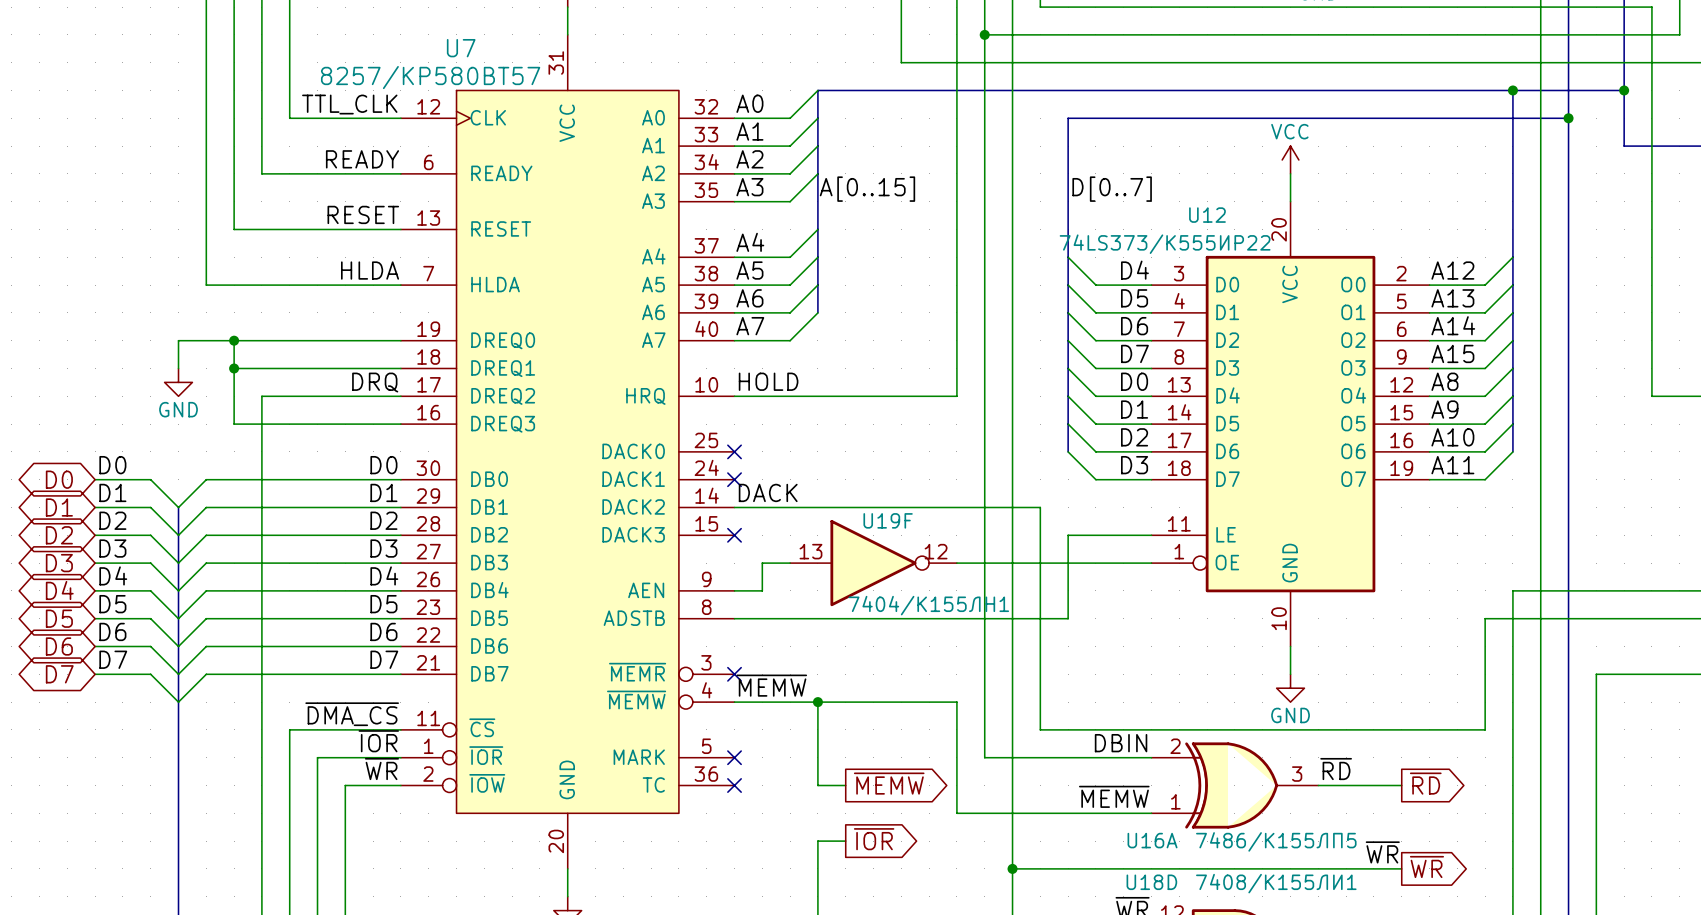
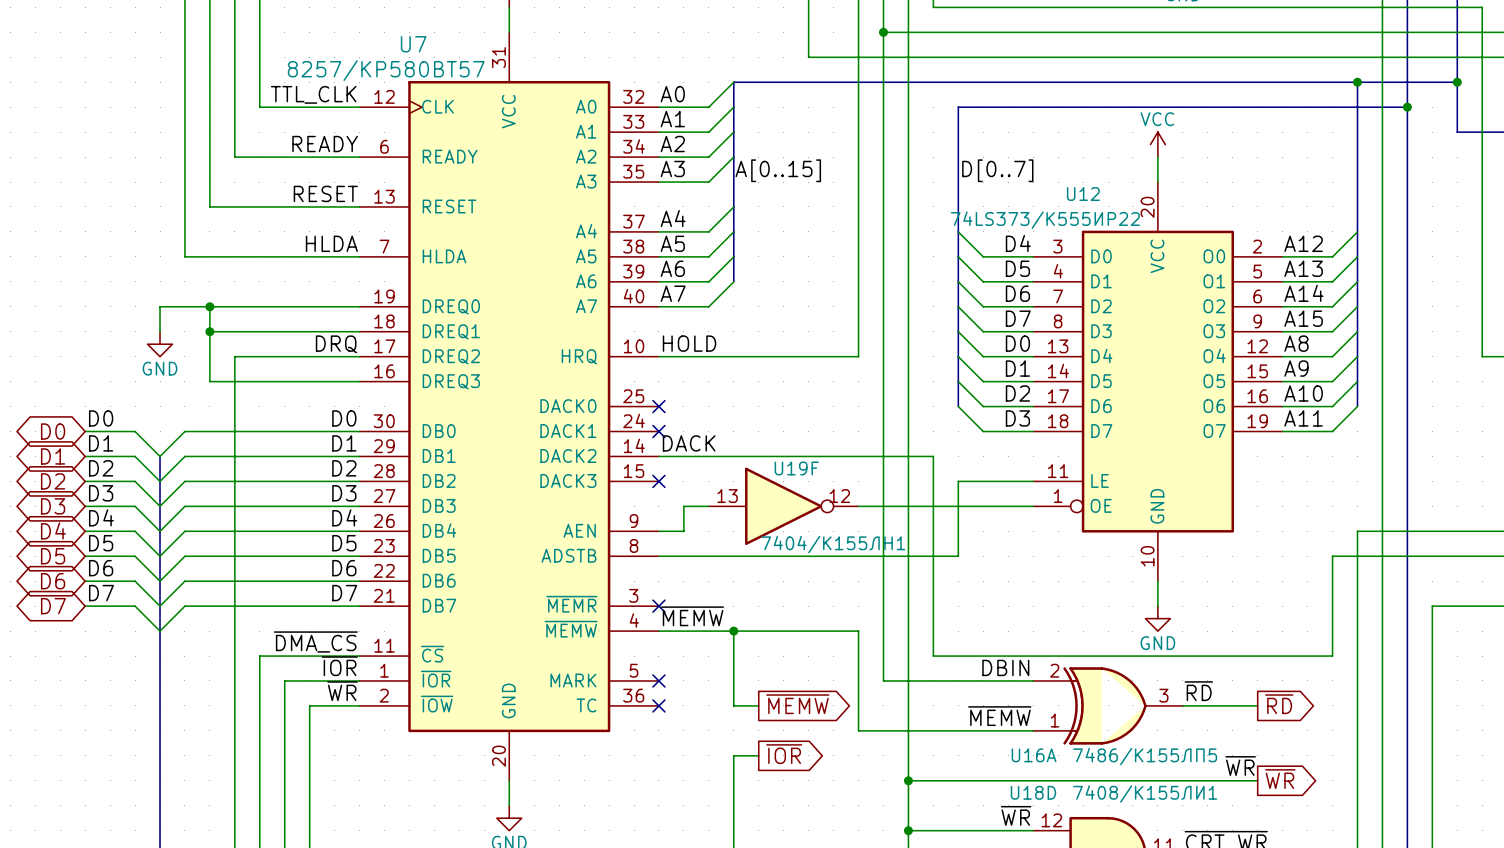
U7 symbol: [400, 34, 735, 869] -> [359, 32, 659, 781]

